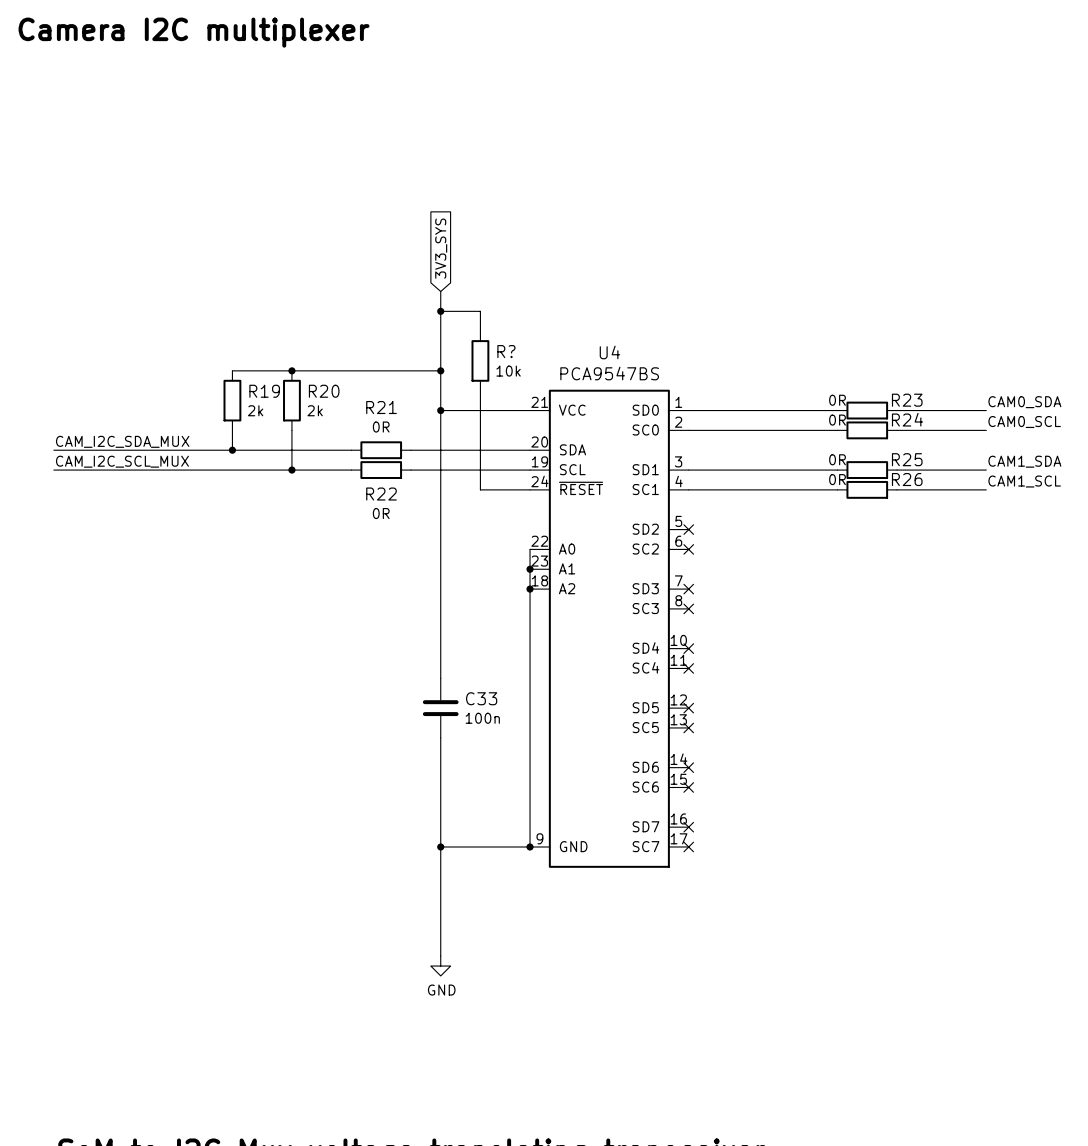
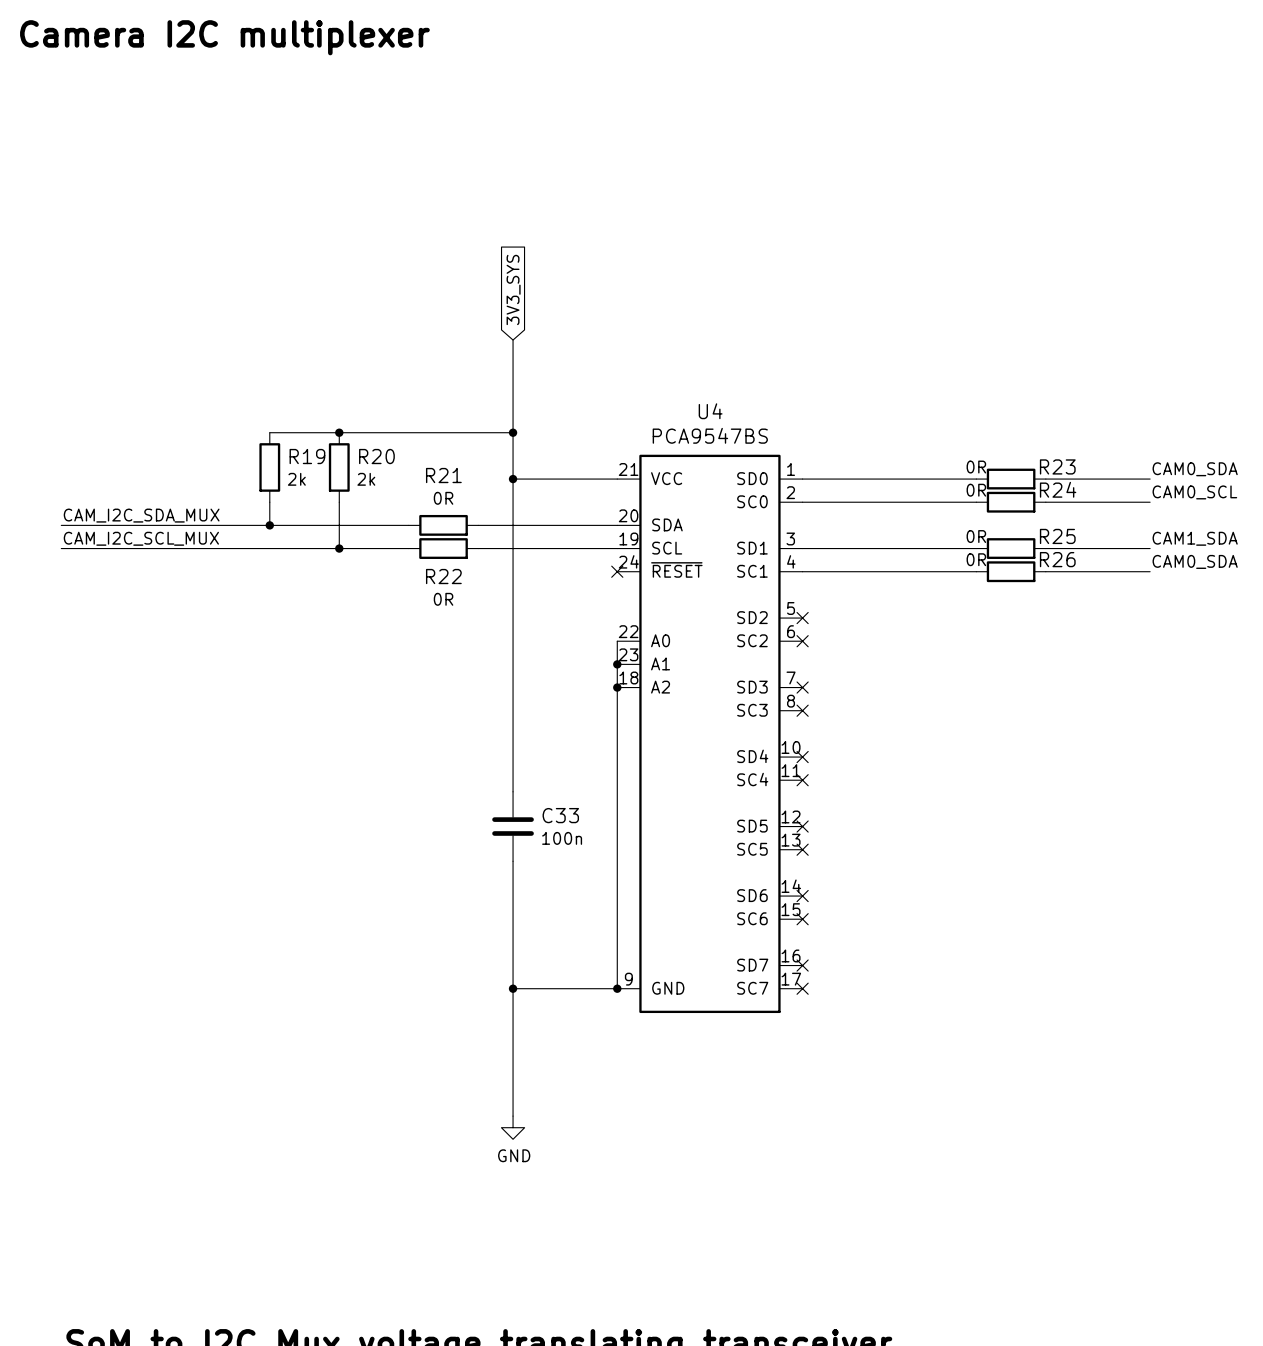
wire: (440, 311) (480, 311) (480, 331) -> none
junction: (440, 311) -> none
R?: (480, 360) -> none
wire: (480, 390) (480, 489) (530, 489) -> none
label: CAM1_SCL (1024, 481) -> CAM0_SDA (1195, 561)
no-connect mark: none -> (617, 571)

